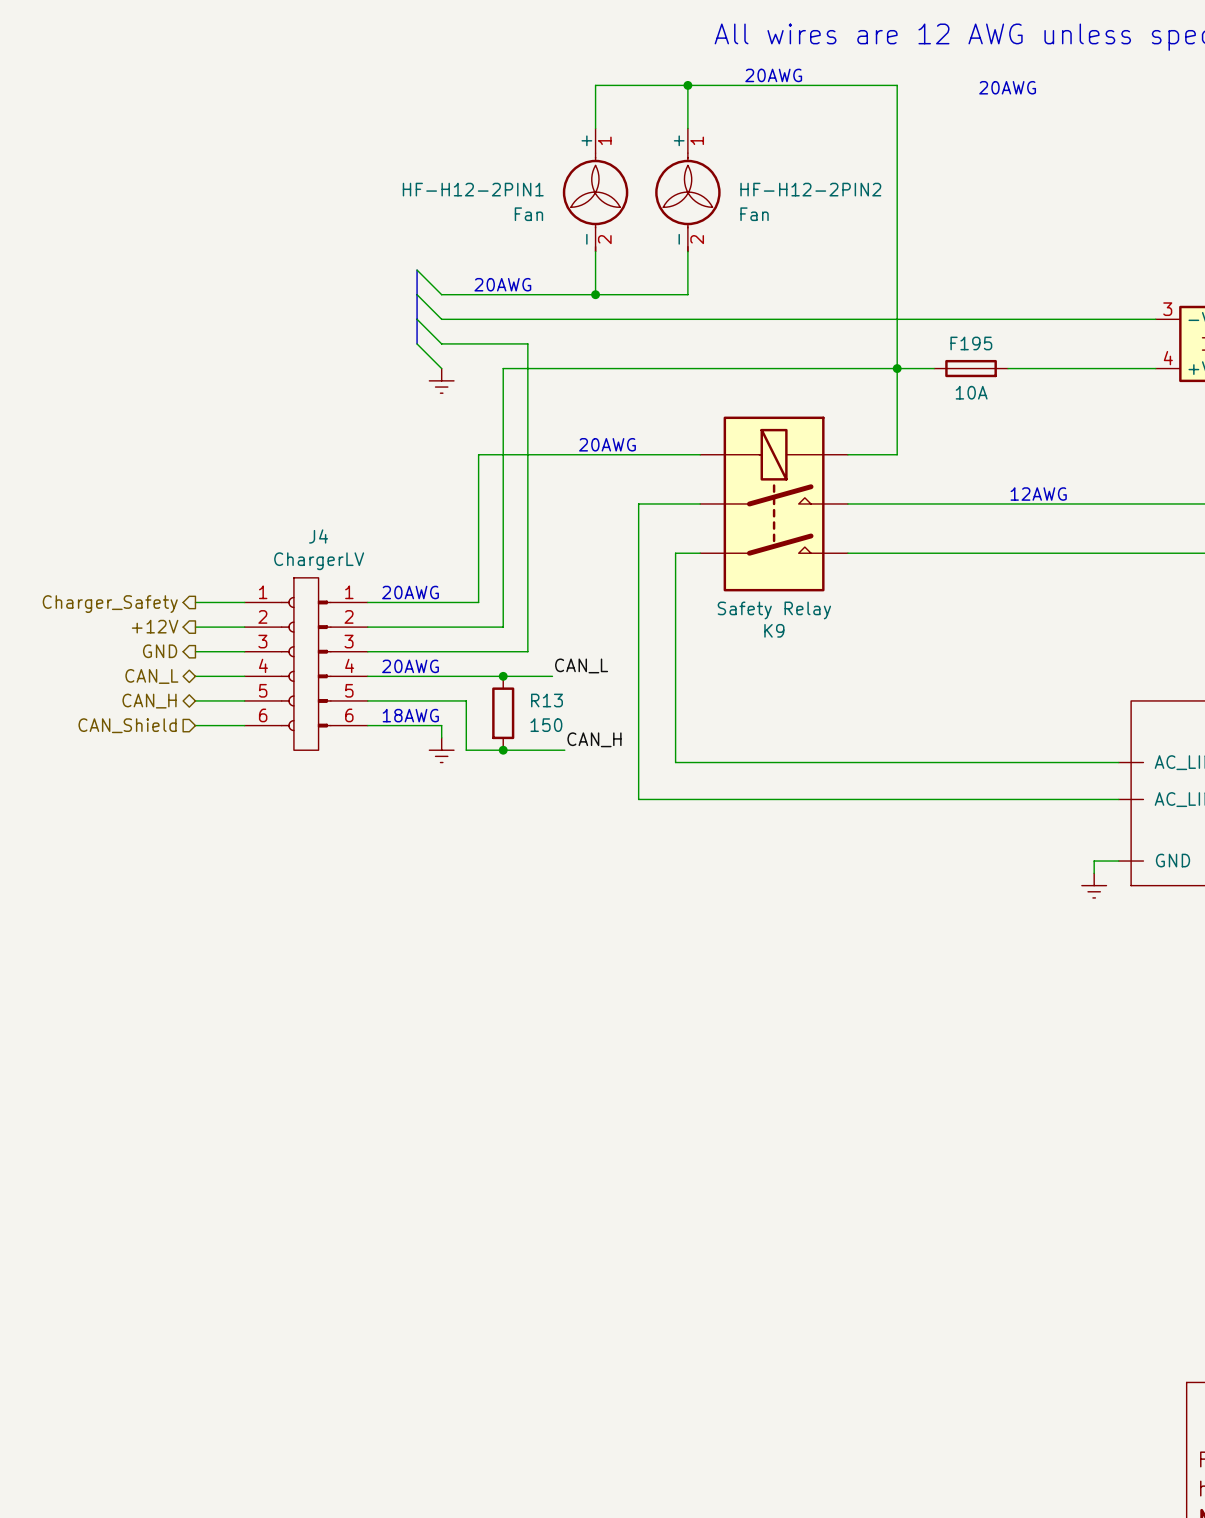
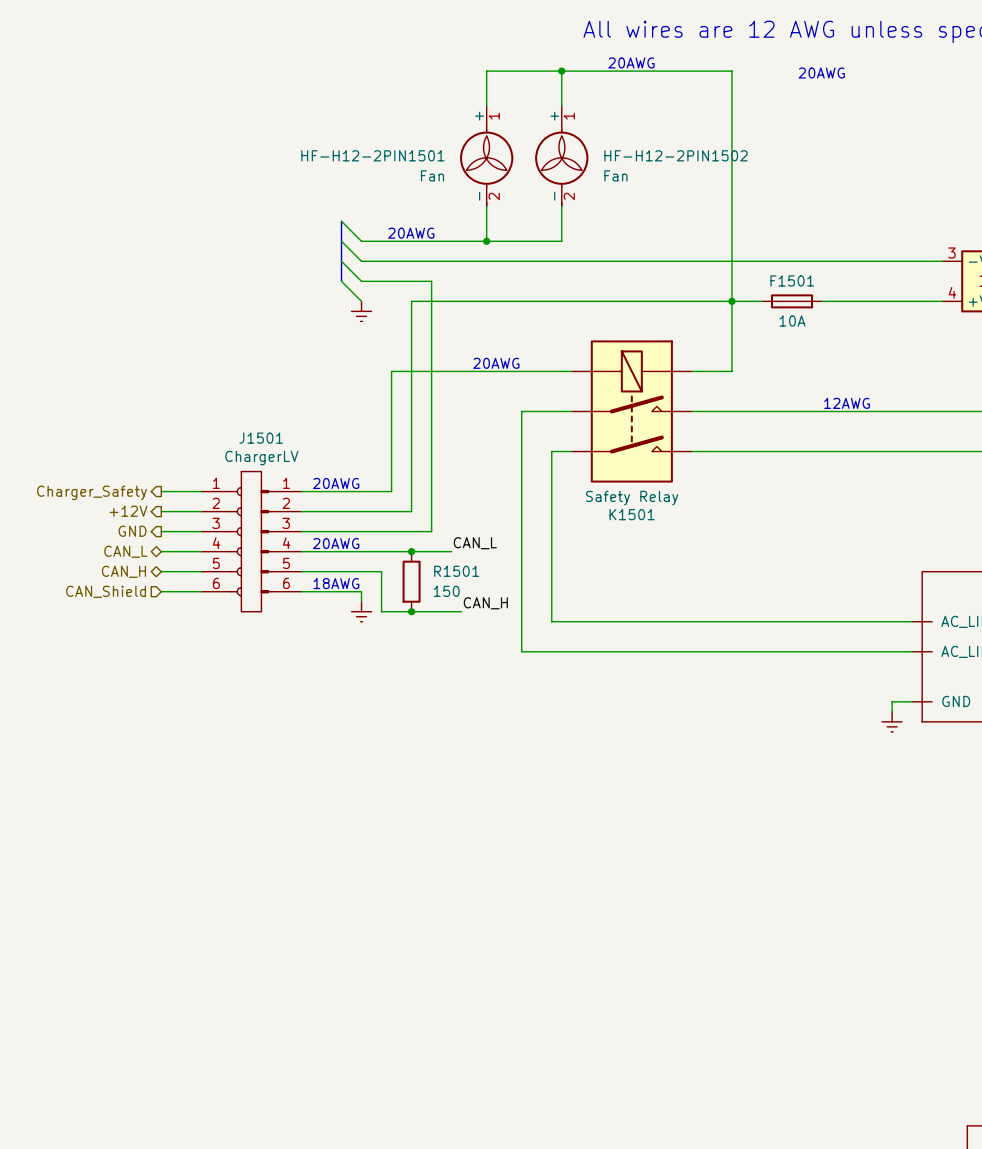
HF-H12-2PIN1 name: HF-H12-2PIN1 (473, 189) -> HF-H12-2PIN1501 (372, 155)
HF-H12-2PIN2 name: HF-H12-2PIN2 (810, 189) -> HF-H12-2PIN1502 (676, 155)
F195 name: F195 (971, 343) -> F1501 (792, 280)
J4 name: J4 (318, 536) -> J1501 (261, 438)
K9 name: K9 (774, 630) -> K1501 (632, 514)
R13 name: R13 (547, 700) -> R1501 (456, 571)

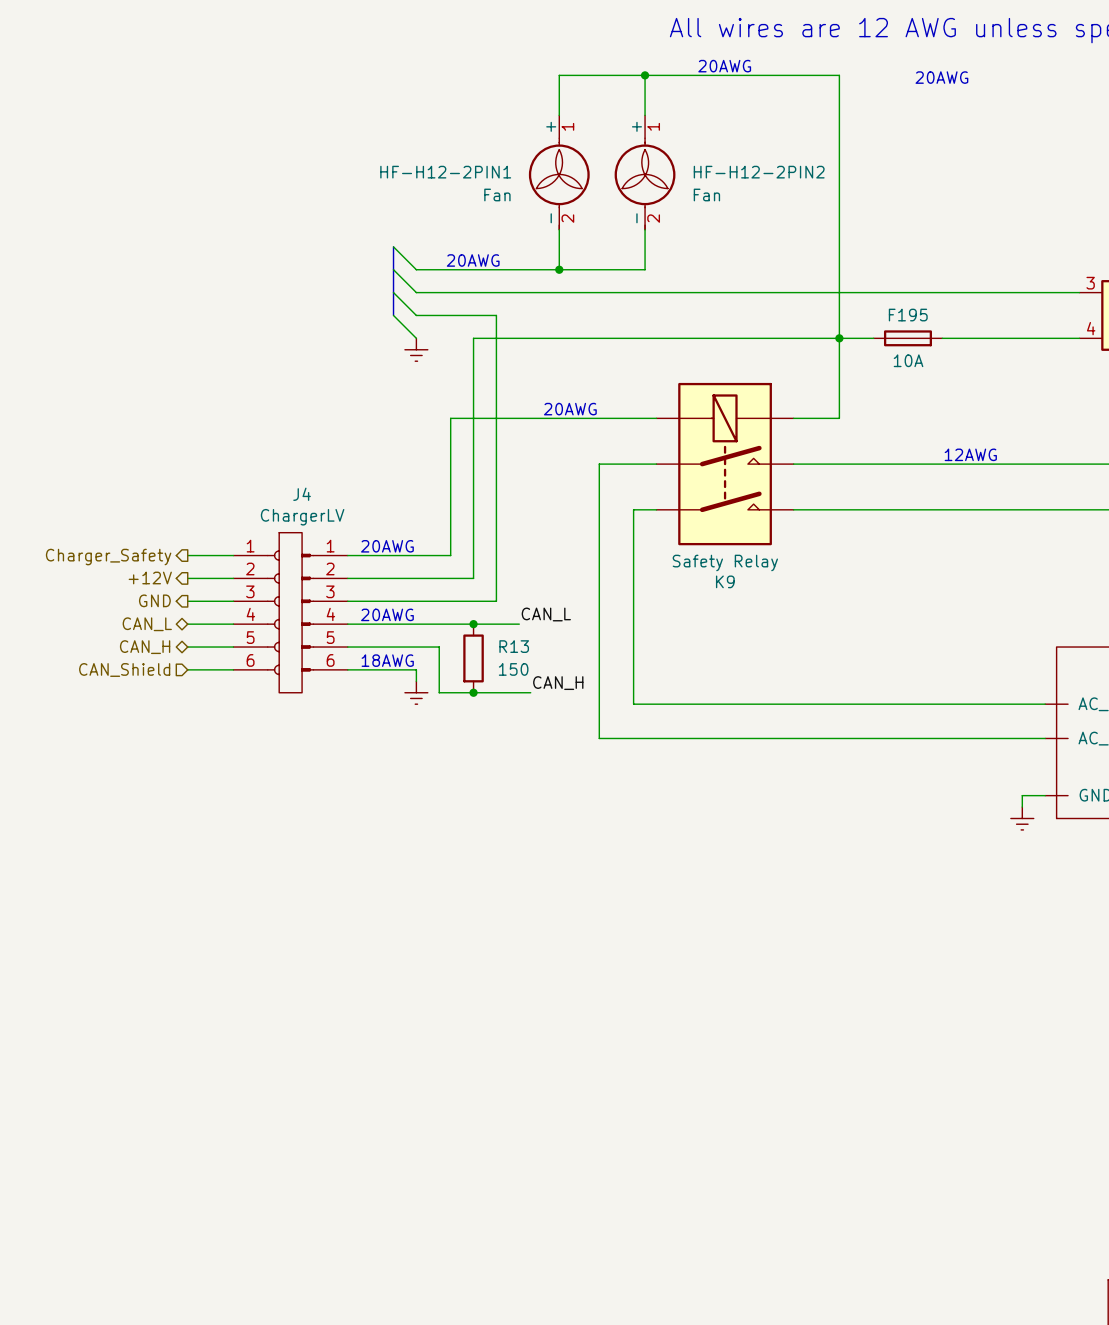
HF-H12-2PIN1501 name: HF-H12-2PIN1501 (372, 155) -> HF-H12-2PIN1 (445, 172)
HF-H12-2PIN1502 name: HF-H12-2PIN1502 (676, 155) -> HF-H12-2PIN2 (759, 172)
F1501 name: F1501 (792, 280) -> F195 (908, 315)
J1501 name: J1501 (261, 438) -> J4 (302, 494)
K1501 name: K1501 (632, 514) -> K9 (725, 581)
R1501 name: R1501 (456, 571) -> R13 (514, 646)

